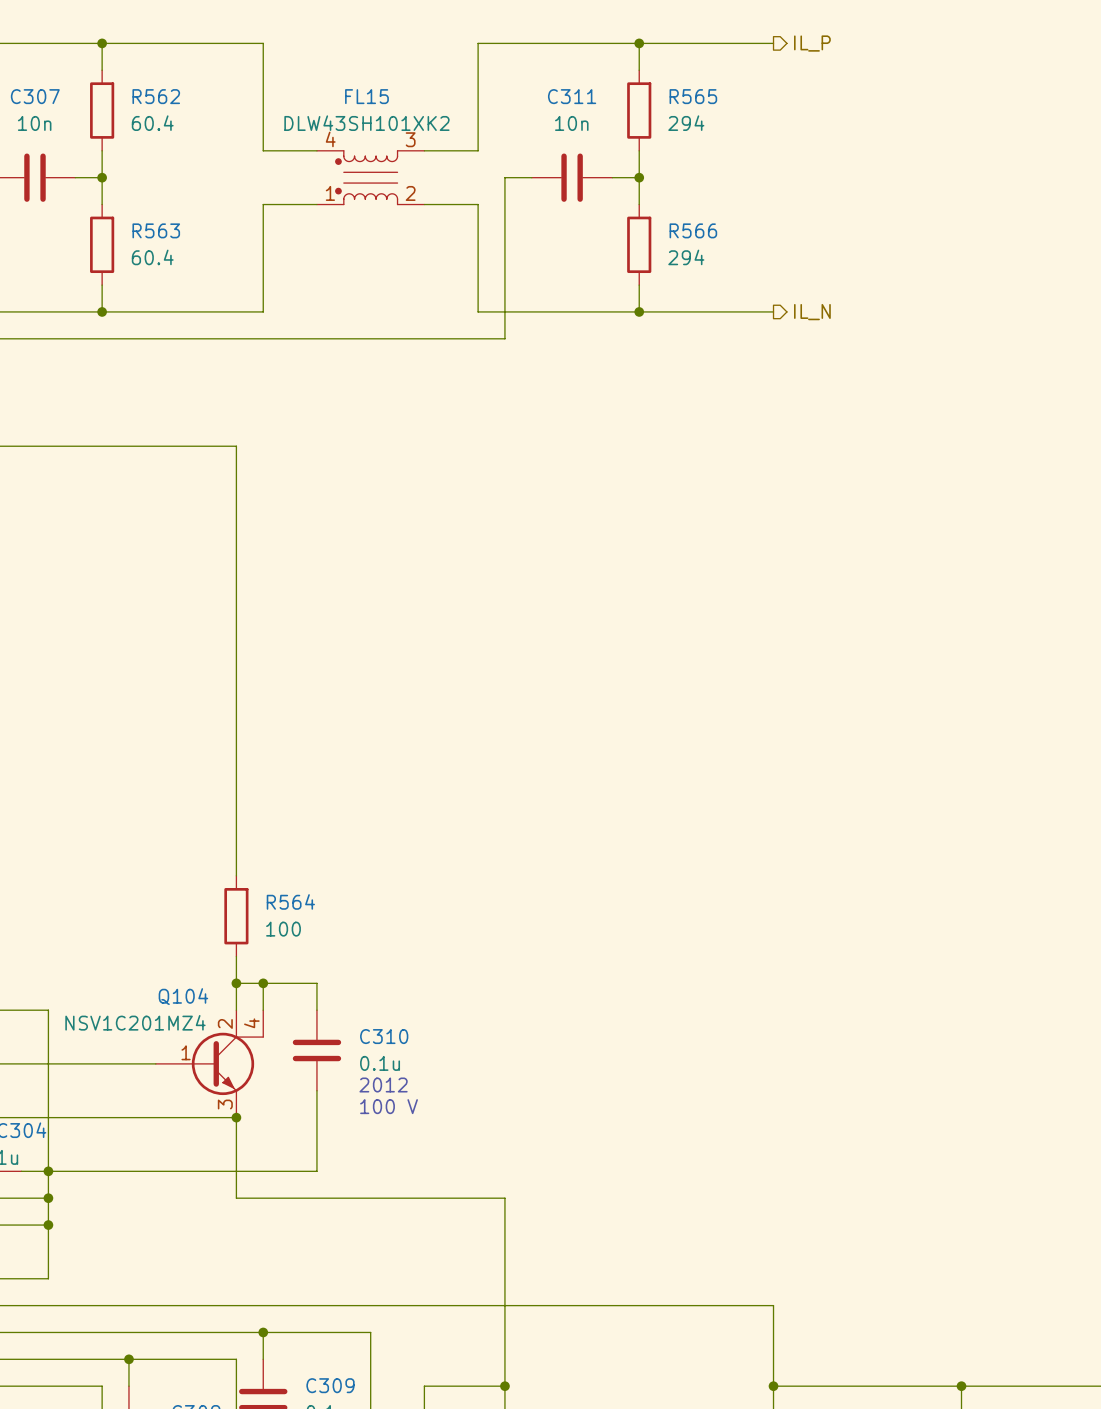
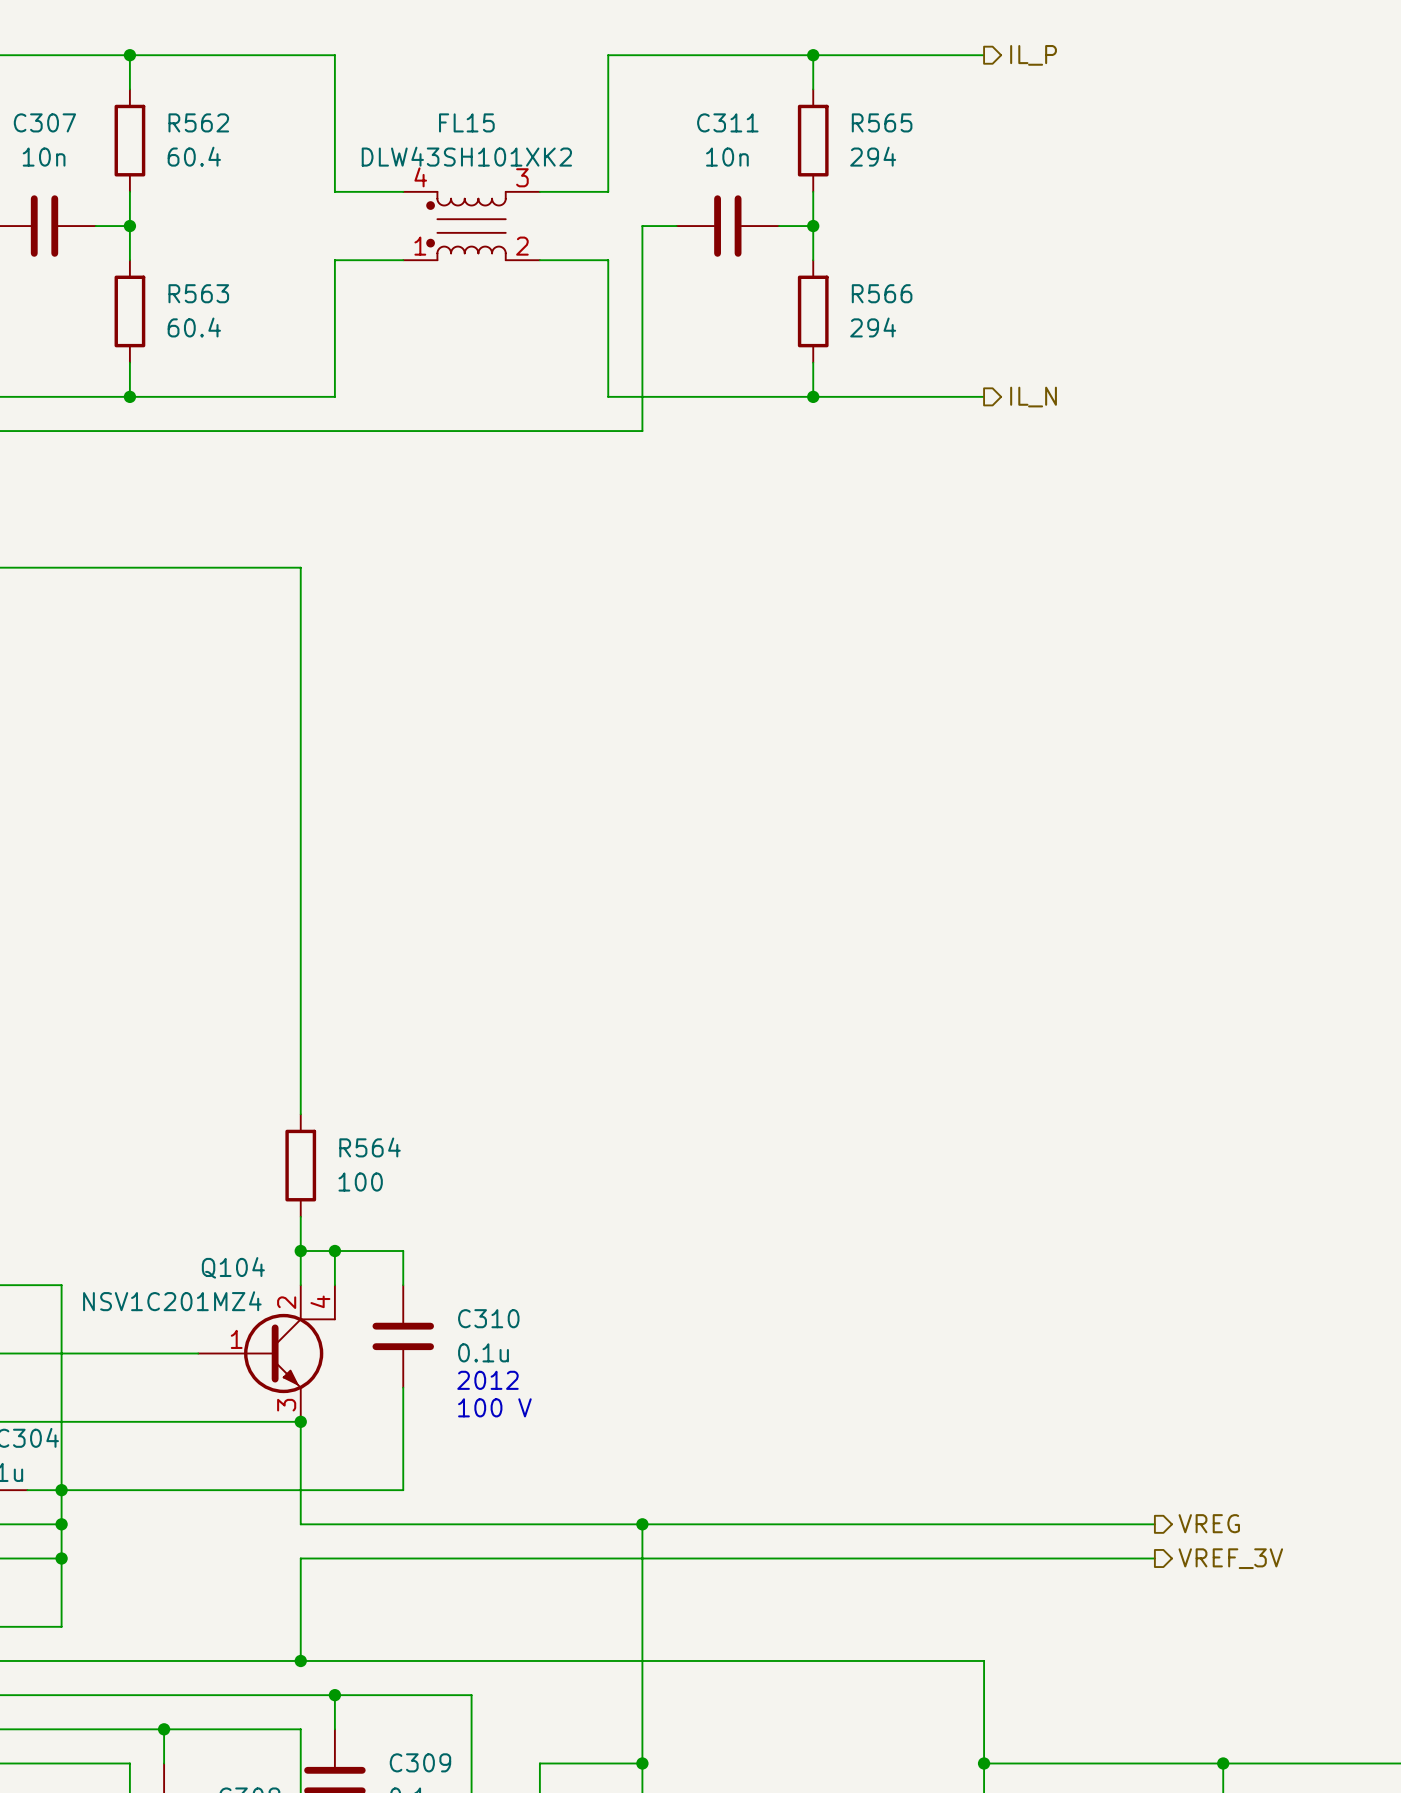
hierarchical label: none -> VREG (1209, 1523)
wire: none -> (642, 1524) (1154, 1524)
junction: none -> (642, 1524)
wire: none -> (1154, 1558) (300, 1558) (300, 1660)
hierarchical label: none -> VREF_3V (1230, 1558)
junction: none -> (300, 1660)

